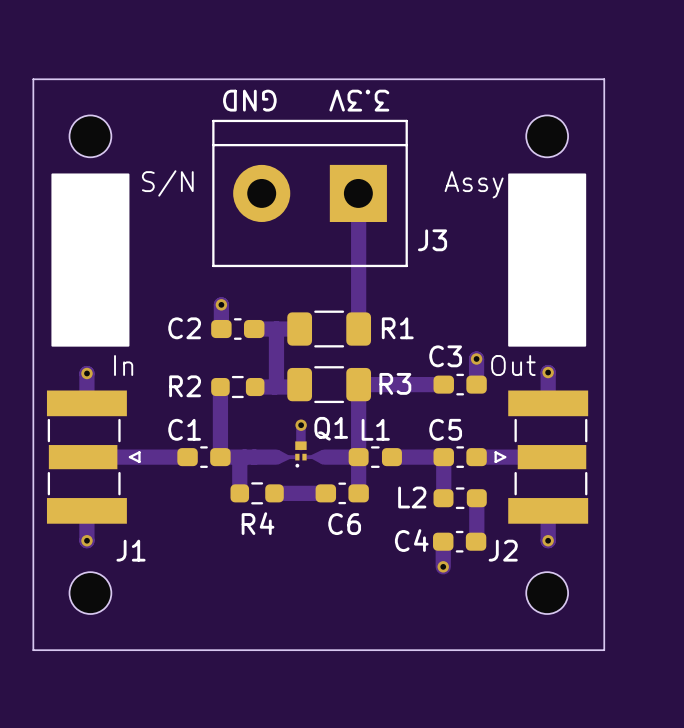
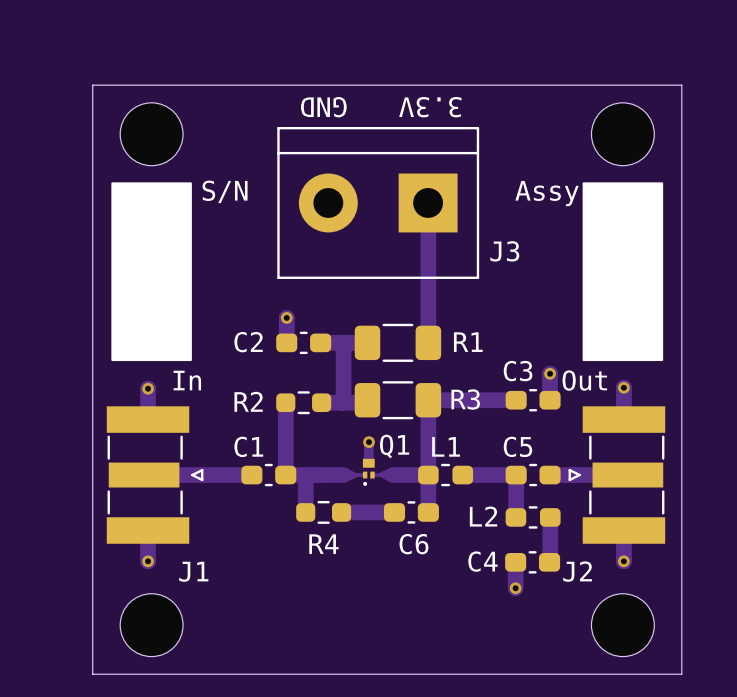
part footprint: [69, 115, 112, 158] -> [120, 102, 184, 166]
part footprint: [526, 115, 569, 158] -> [591, 102, 655, 166]
part footprint: [69, 572, 112, 615] -> [120, 593, 184, 657]
part footprint: [526, 572, 569, 615] -> [591, 593, 655, 657]

